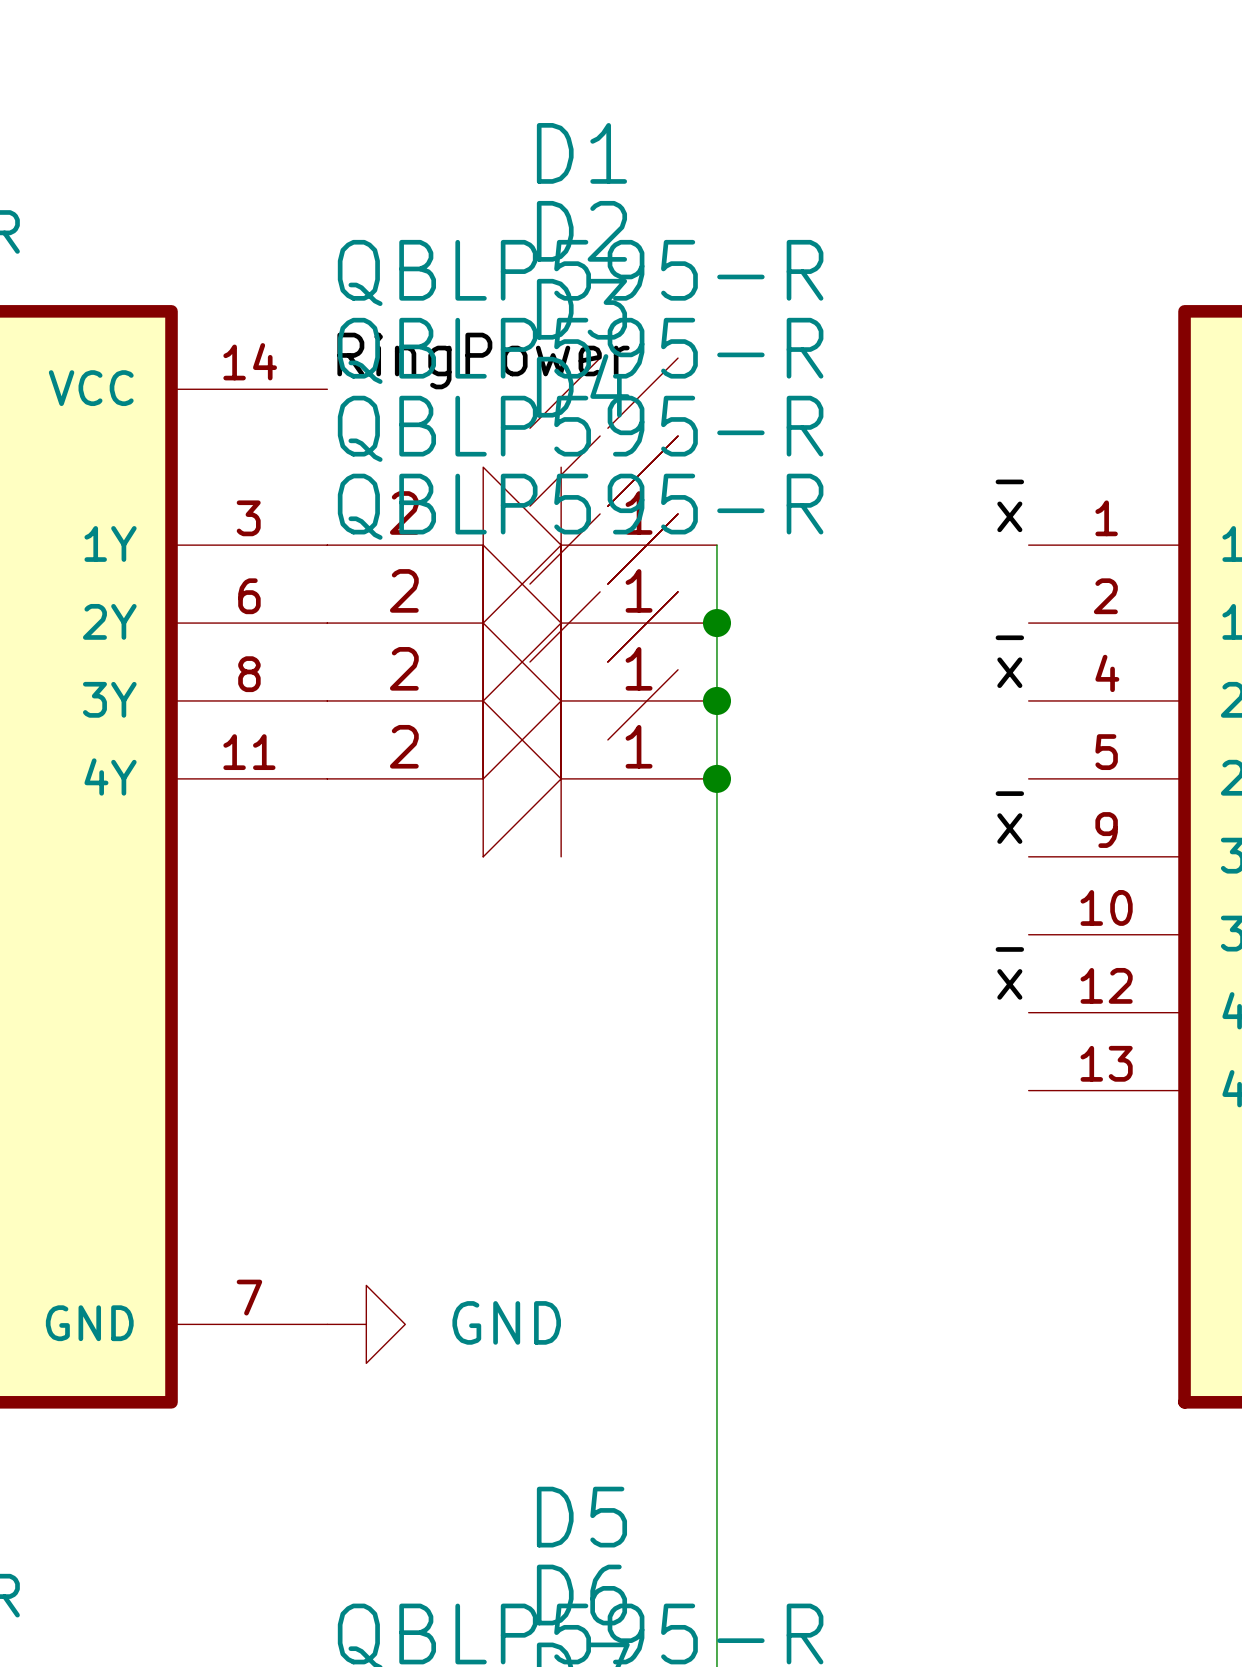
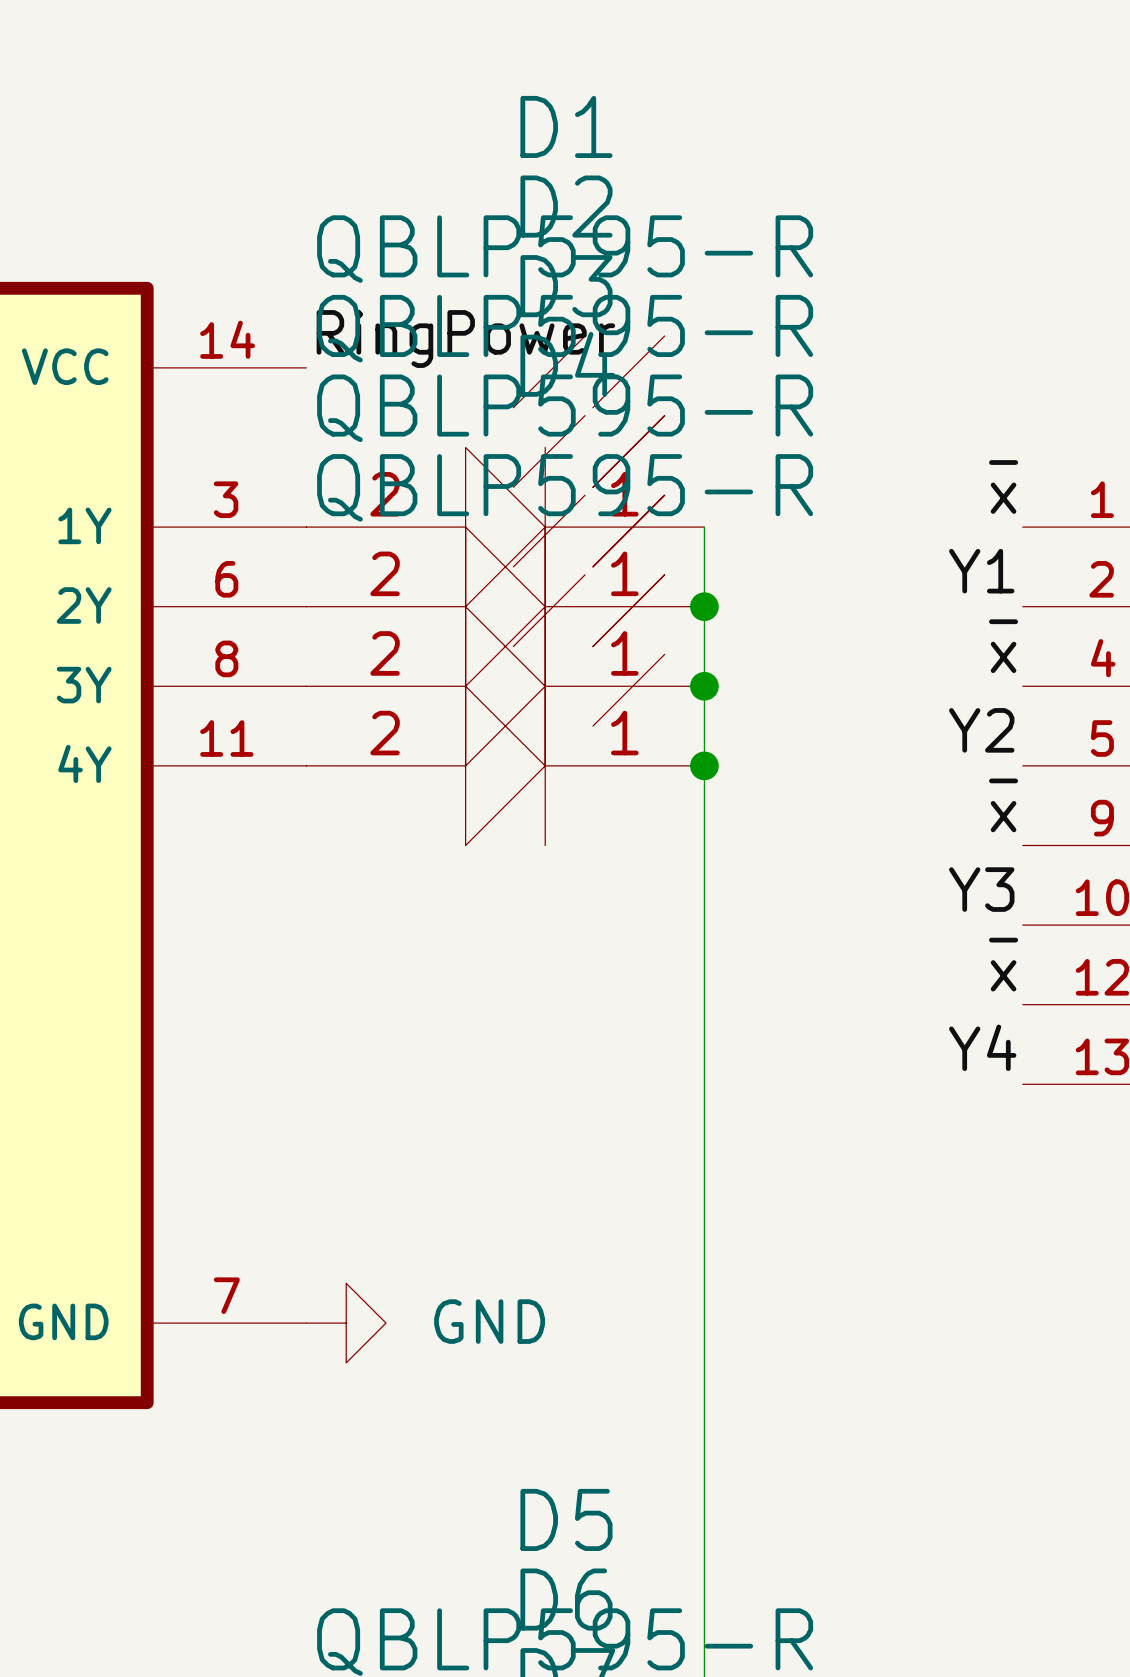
label: none -> Y1 (981, 571)
label: none -> Y2 (981, 730)
label: none -> Y3 (981, 889)
label: none -> Y4 (982, 1047)

